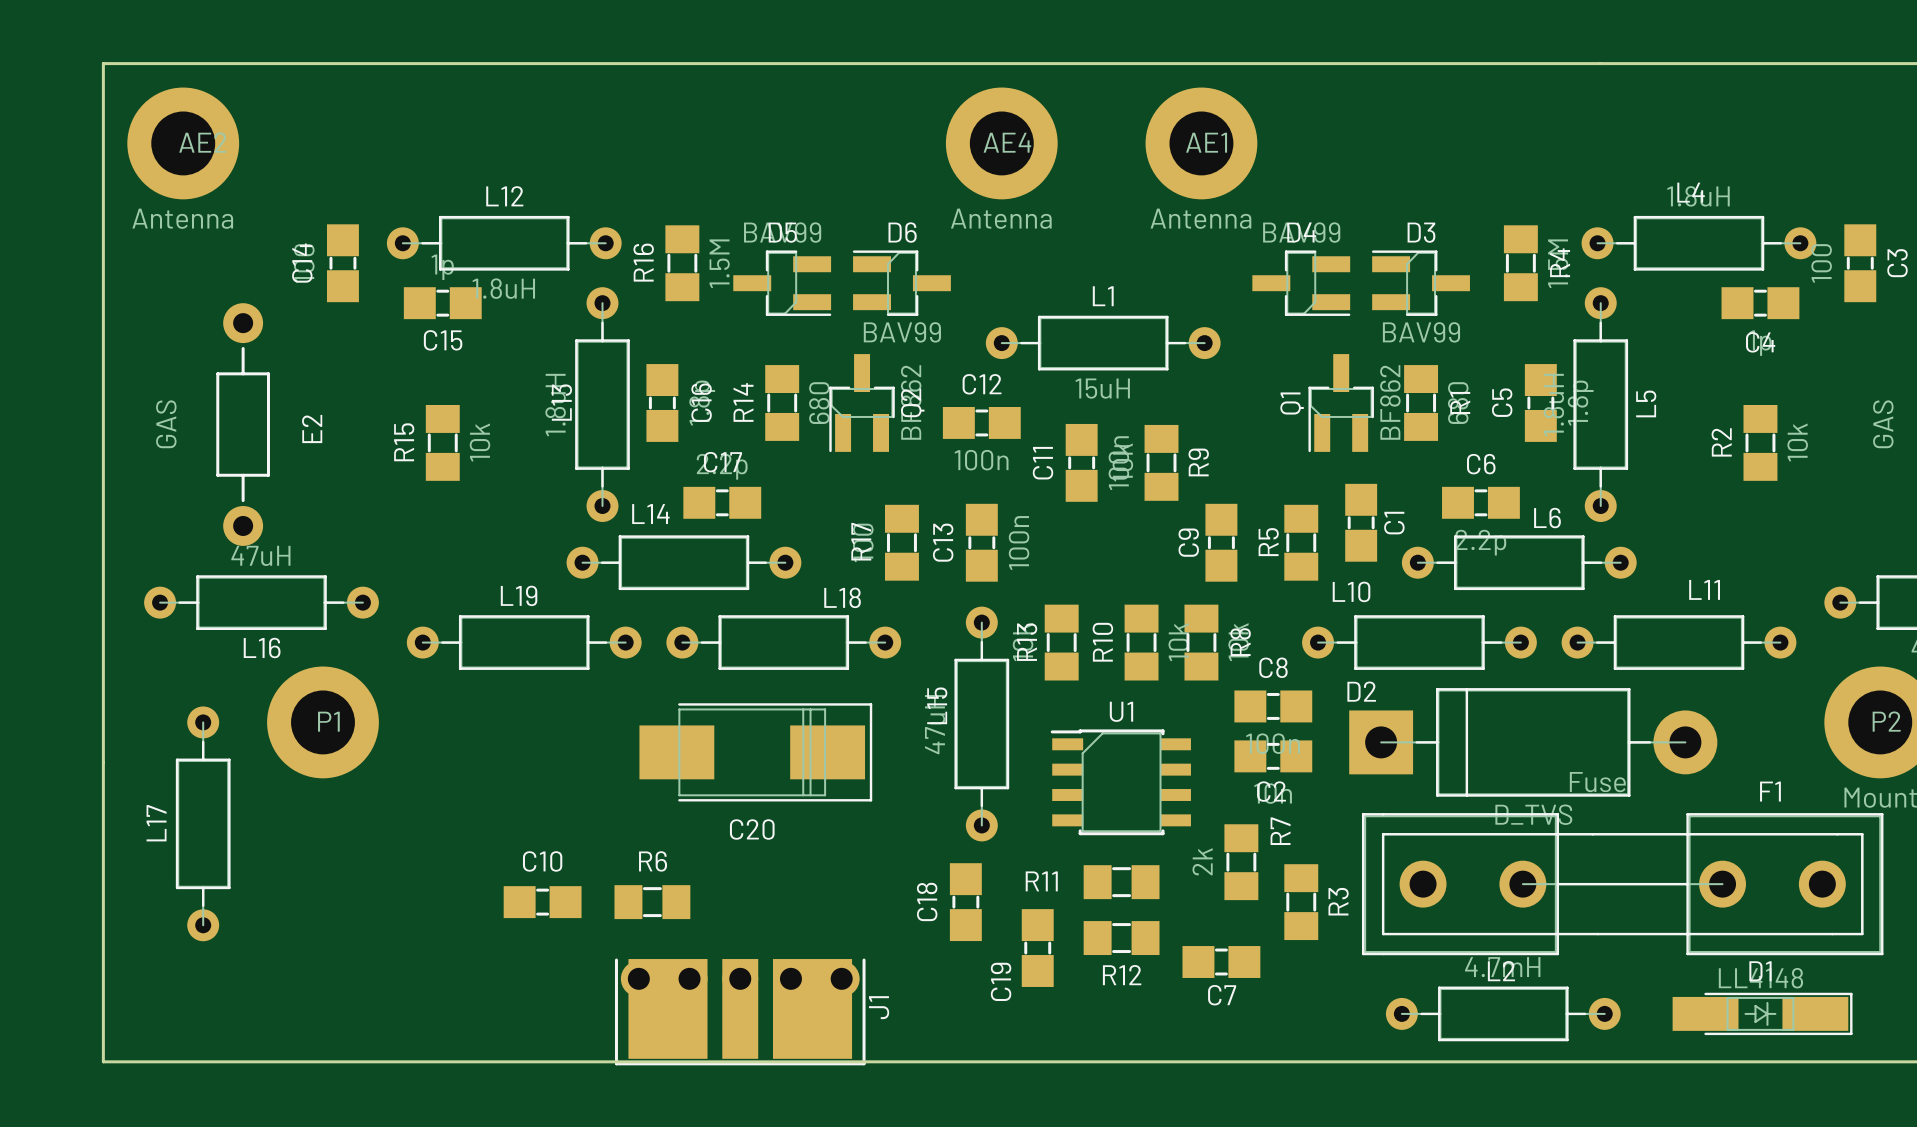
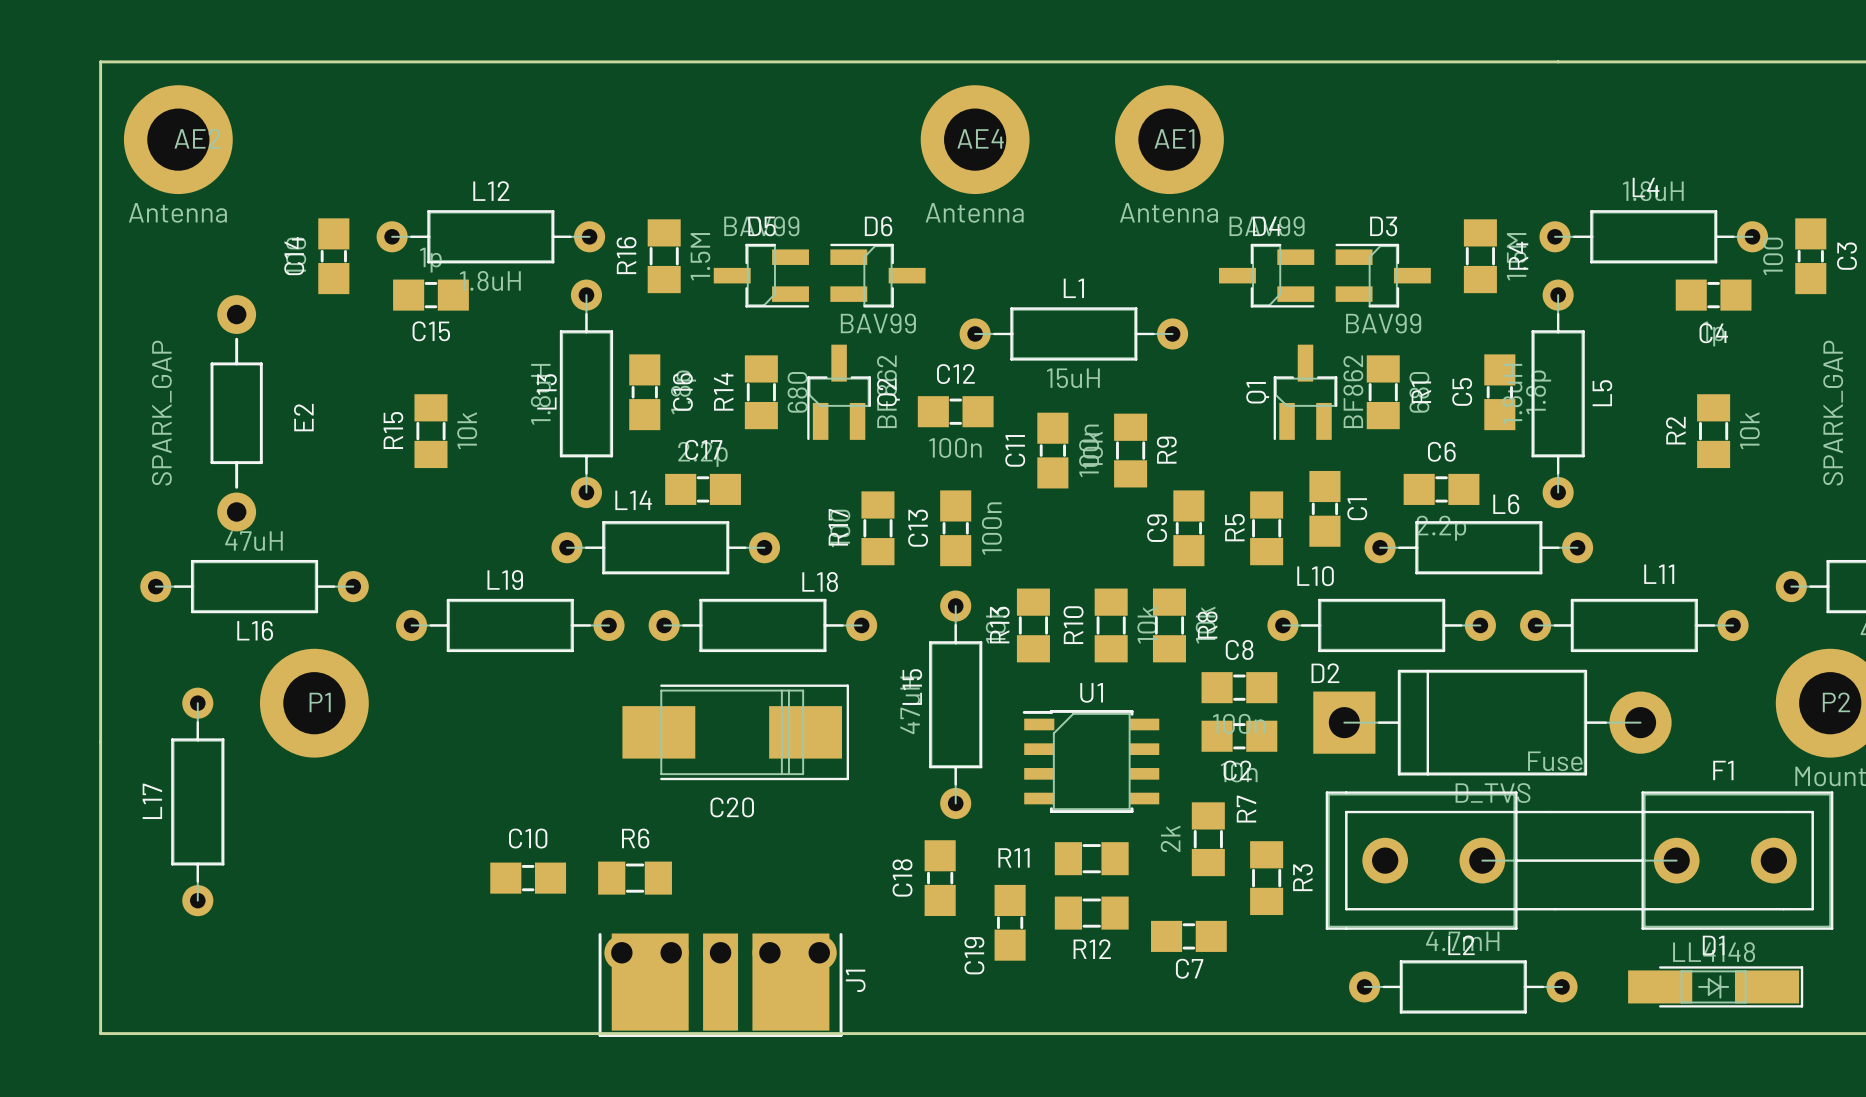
E2 value: GAS (166, 424) -> SPARK_GAP (161, 413)
part value: GAS (1883, 424) -> SPARK_GAP (1833, 413)

